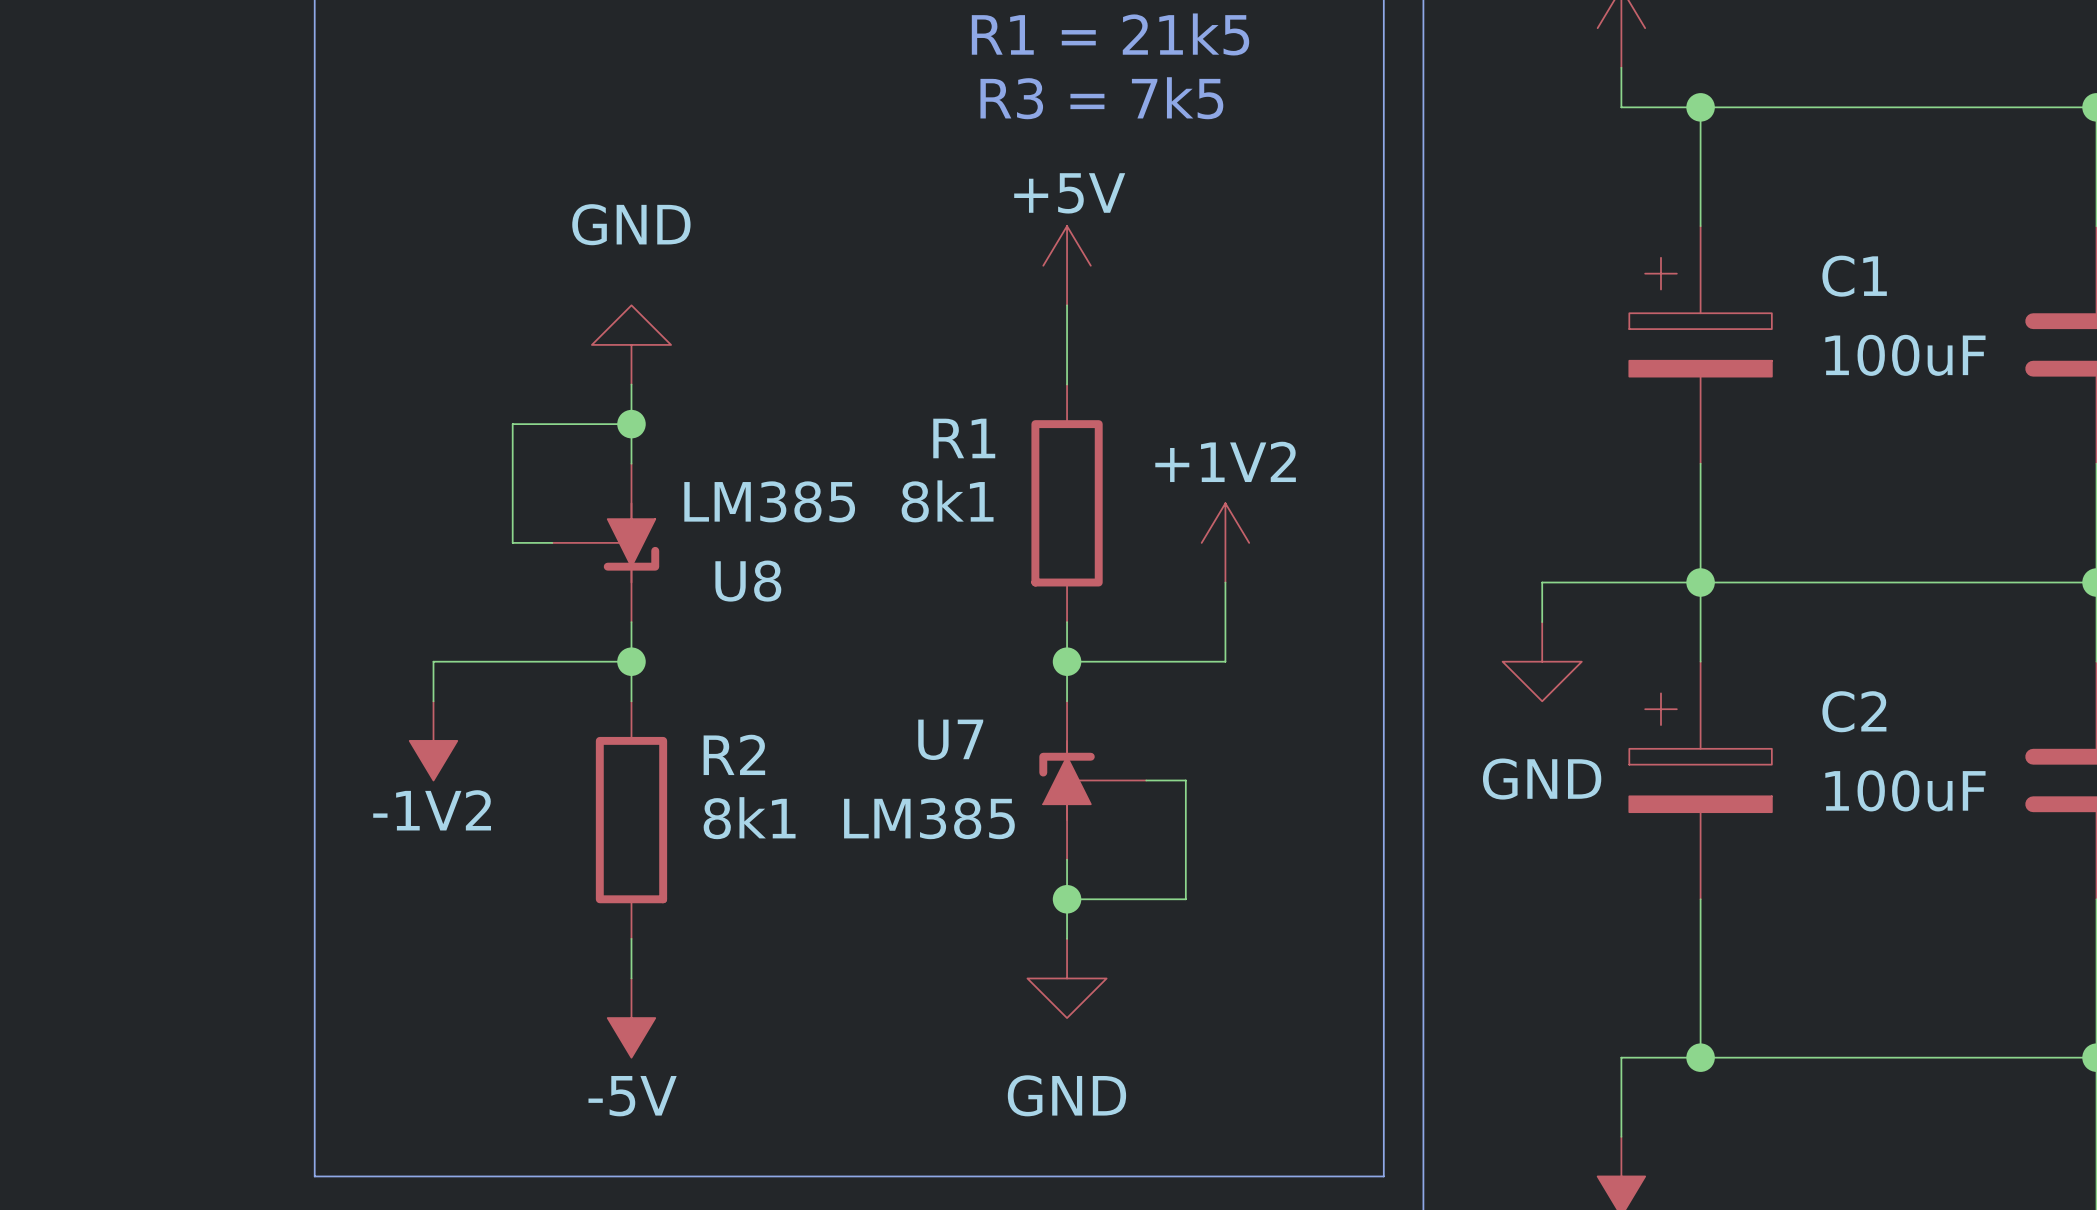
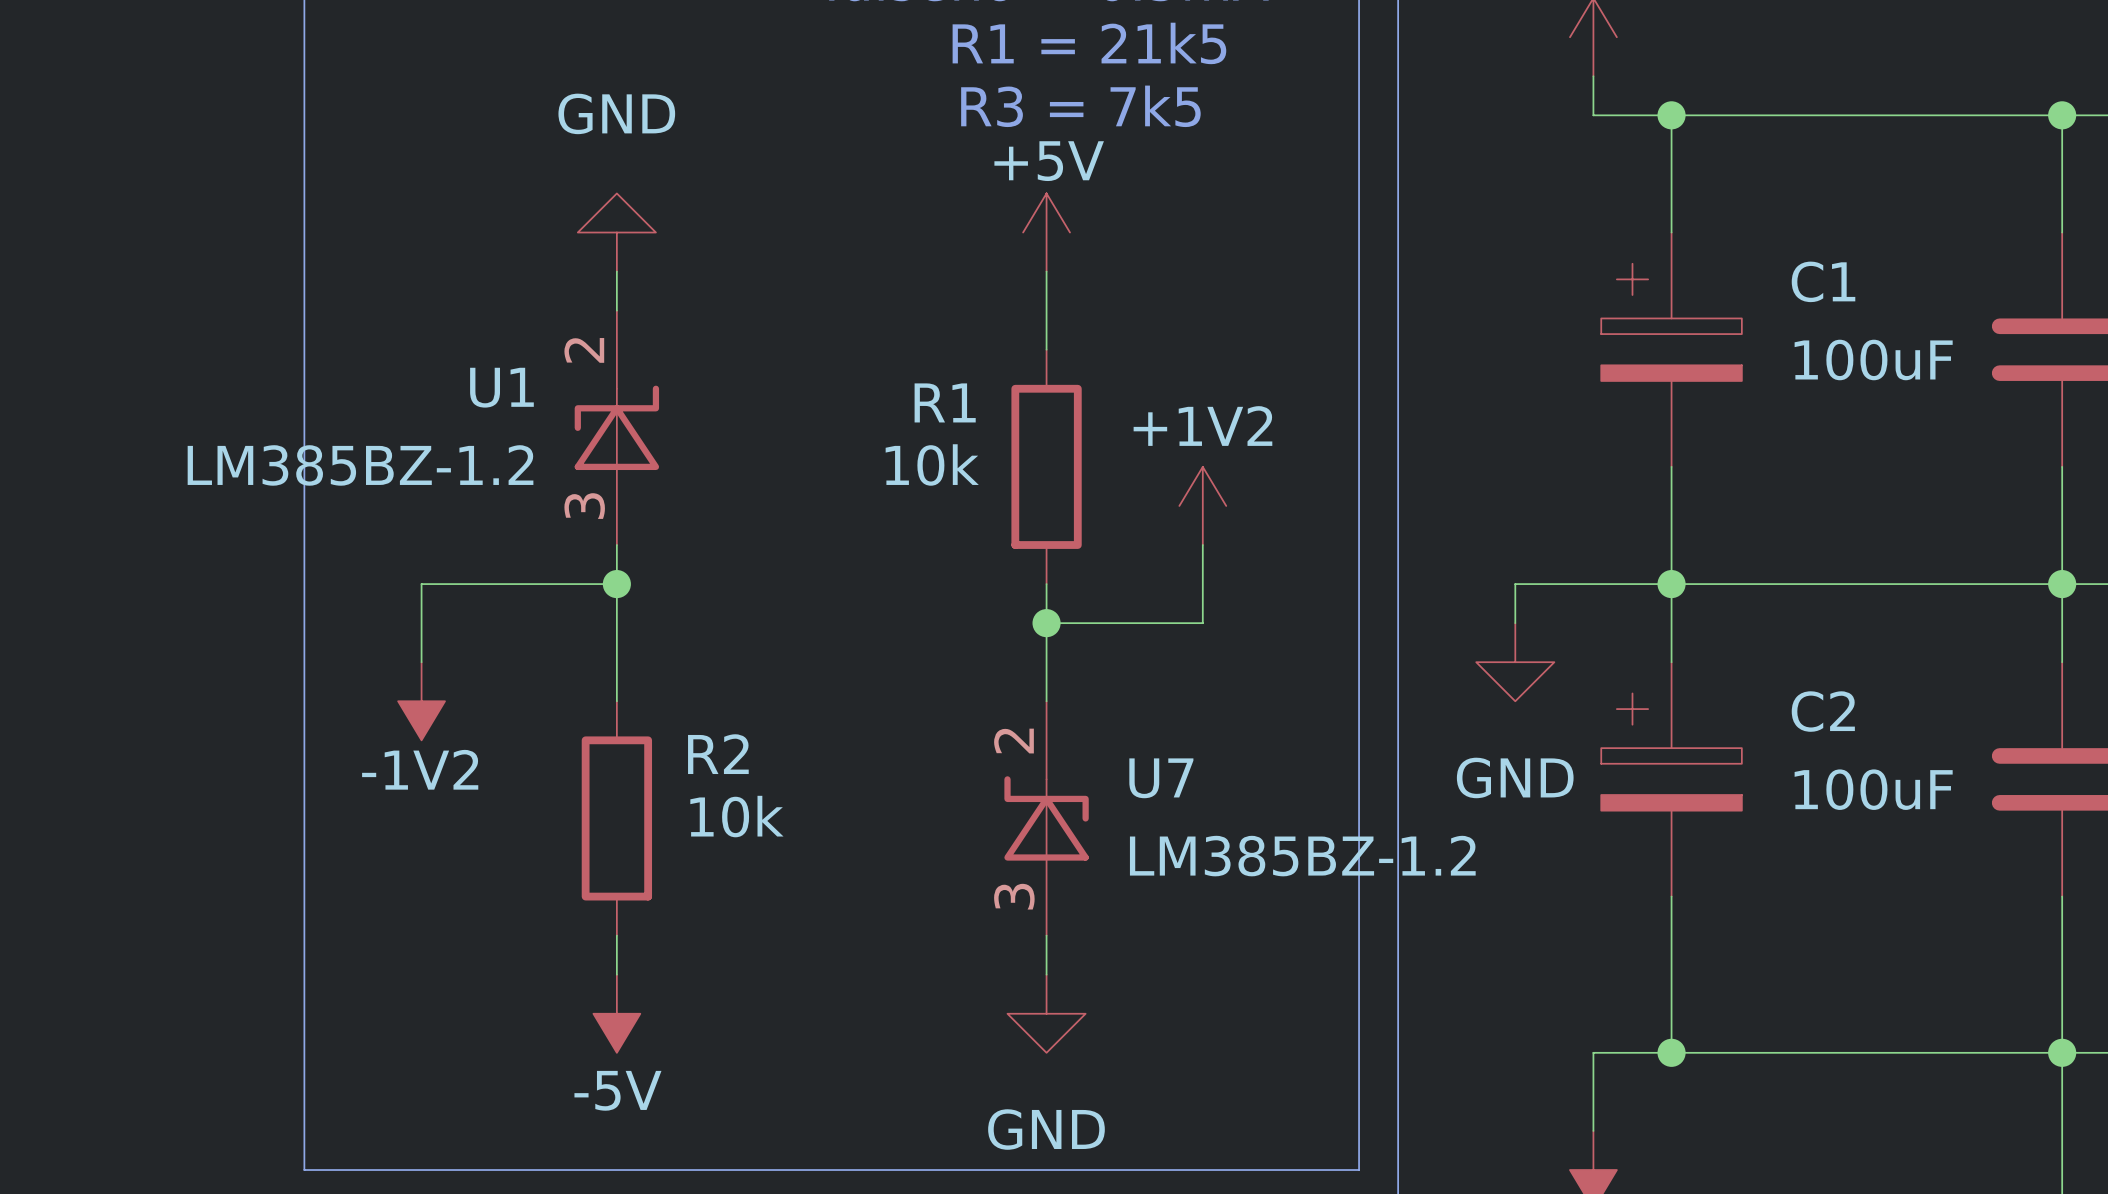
wire: none -> (616, 271) (616, 310)
power symbol position: +5V (1067, 265) -> +5V (1046, 232)
power symbol position: GND (631, 344) -> GND (616, 232)
wire: (631, 424) (512, 424) (512, 542) (552, 542) -> none
junction: (631, 424) -> none
U1: none -> LM385BZ-1.2 (616, 427)
R1 value: 8k1 (947, 501) -> 10k (932, 464)
R1 position: (1067, 503) -> (1046, 466)
U8: LM385 (605, 542) -> none
power symbol position: +1V2 (1225, 542) -> +1V2 (1202, 505)
wire: none -> (616, 584) (421, 584) (421, 662)
junction: none -> (616, 584)
wire: (1225, 622) (1225, 661) (1067, 661) -> (1202, 623) (1046, 623) (1046, 584)
wire: (631, 661) (433, 661) (433, 701) -> none
junction: (631, 661) -> none
junction position: (1067, 661) -> (1046, 623)
U7 symbol: [1039, 701, 1147, 860] -> [1004, 701, 1089, 936]
U7 name position: U7 (950, 739) -> U7 (1161, 778)
power symbol position: -1V2 (433, 740) -> -1V2 (421, 701)
wire: (1146, 780) (1185, 780) (1185, 899) (1067, 899) -> none
R2 value: 8k1 (749, 818) -> 10k (736, 816)
U7 value: LM385 (929, 818) -> LM385BZ-1.2 (1302, 856)
junction: (1067, 899) -> none
power symbol position: GND (1067, 978) -> GND (1046, 1013)

